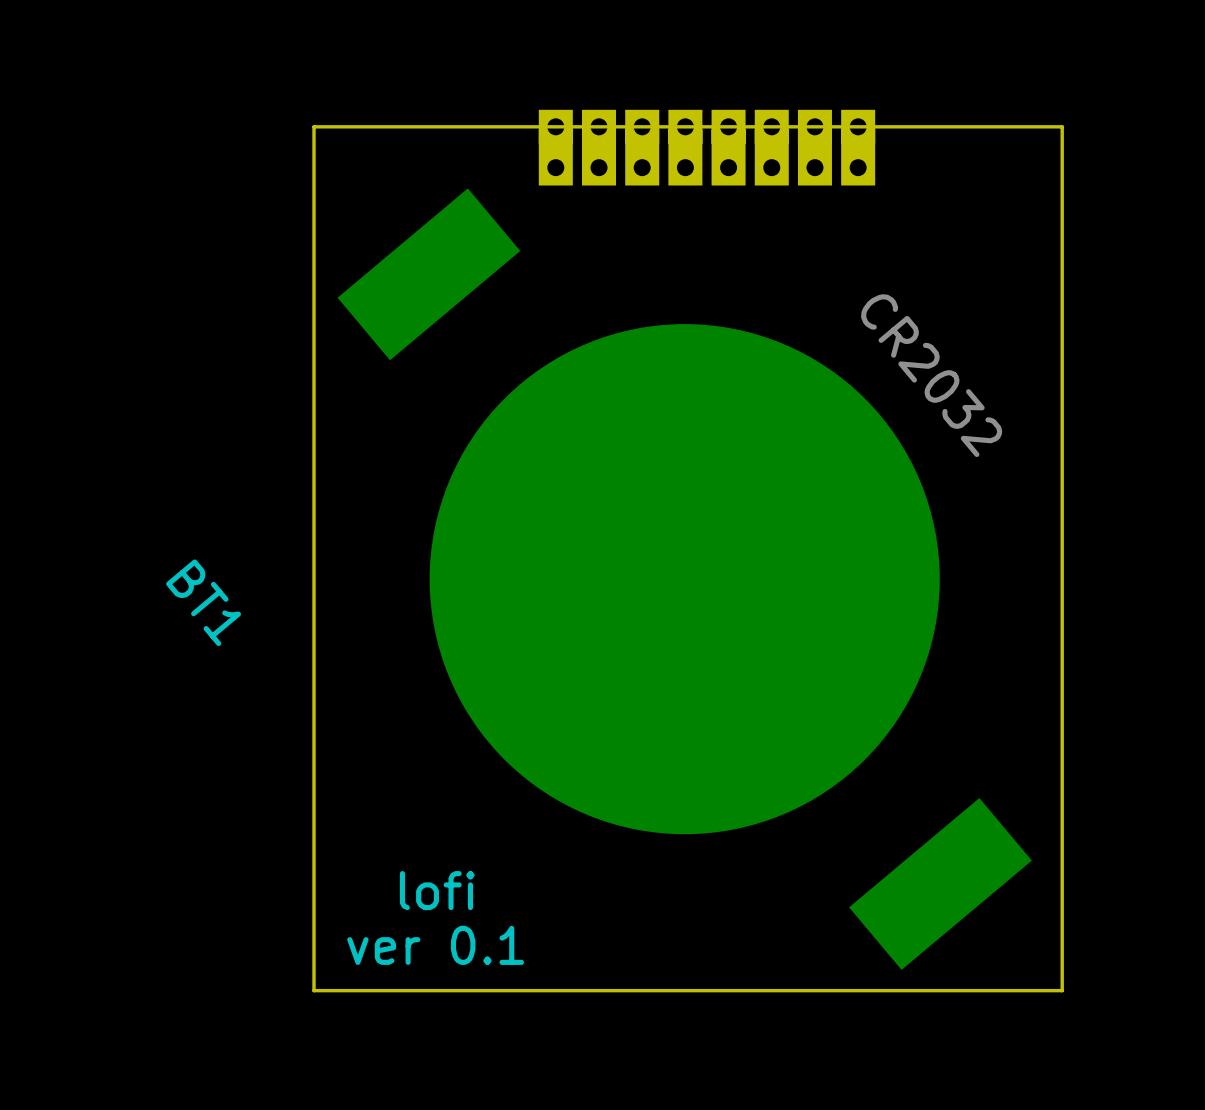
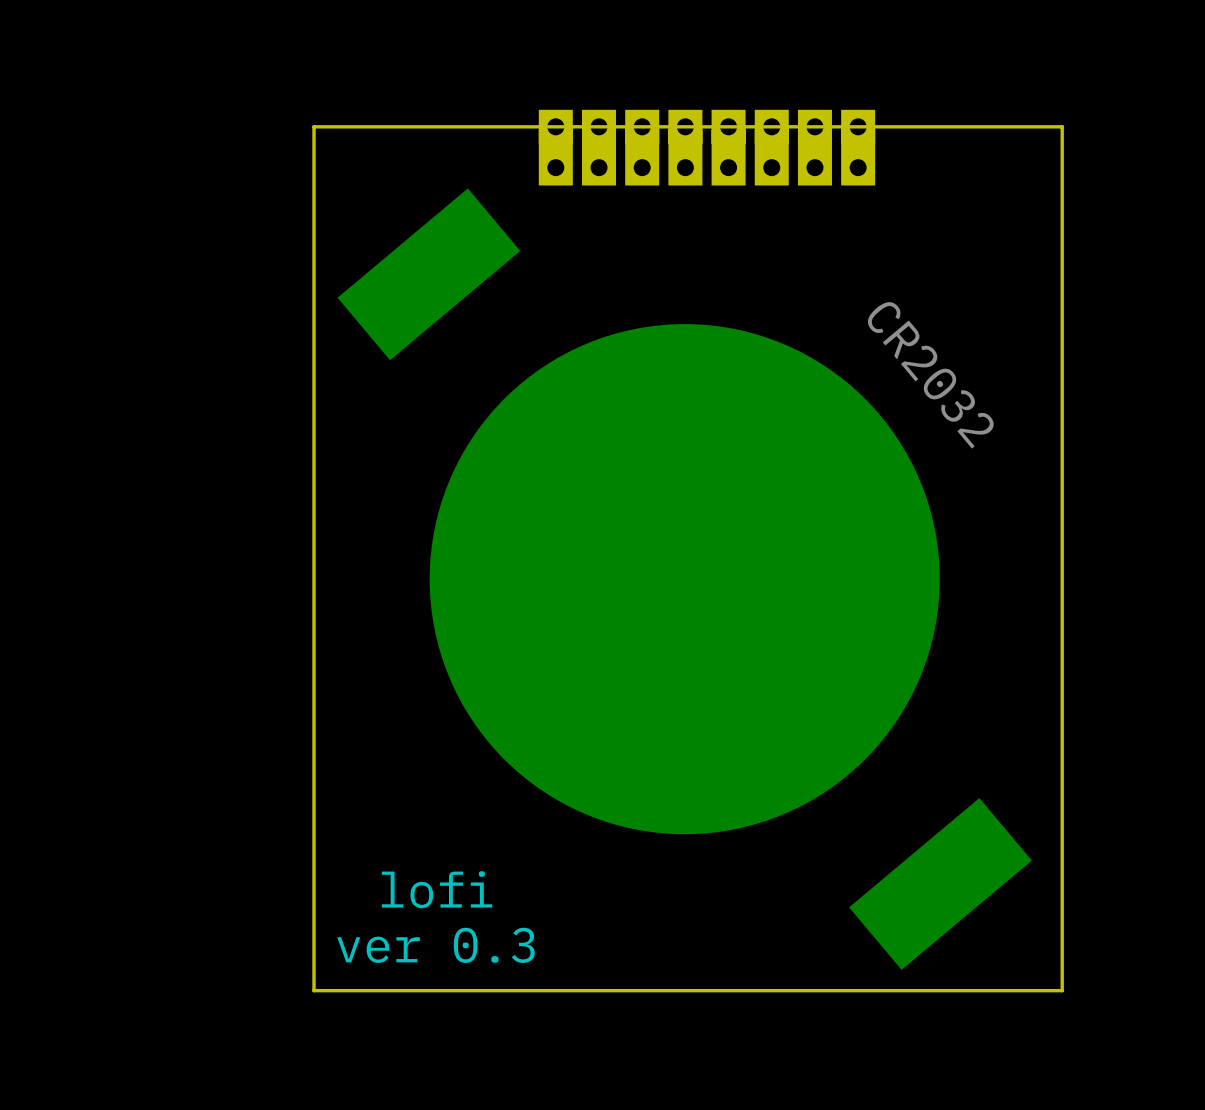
BT1 name: BT1 (203, 602) -> none
text: ver 0.1 (435, 945) -> ver 0.3 (436, 945)

